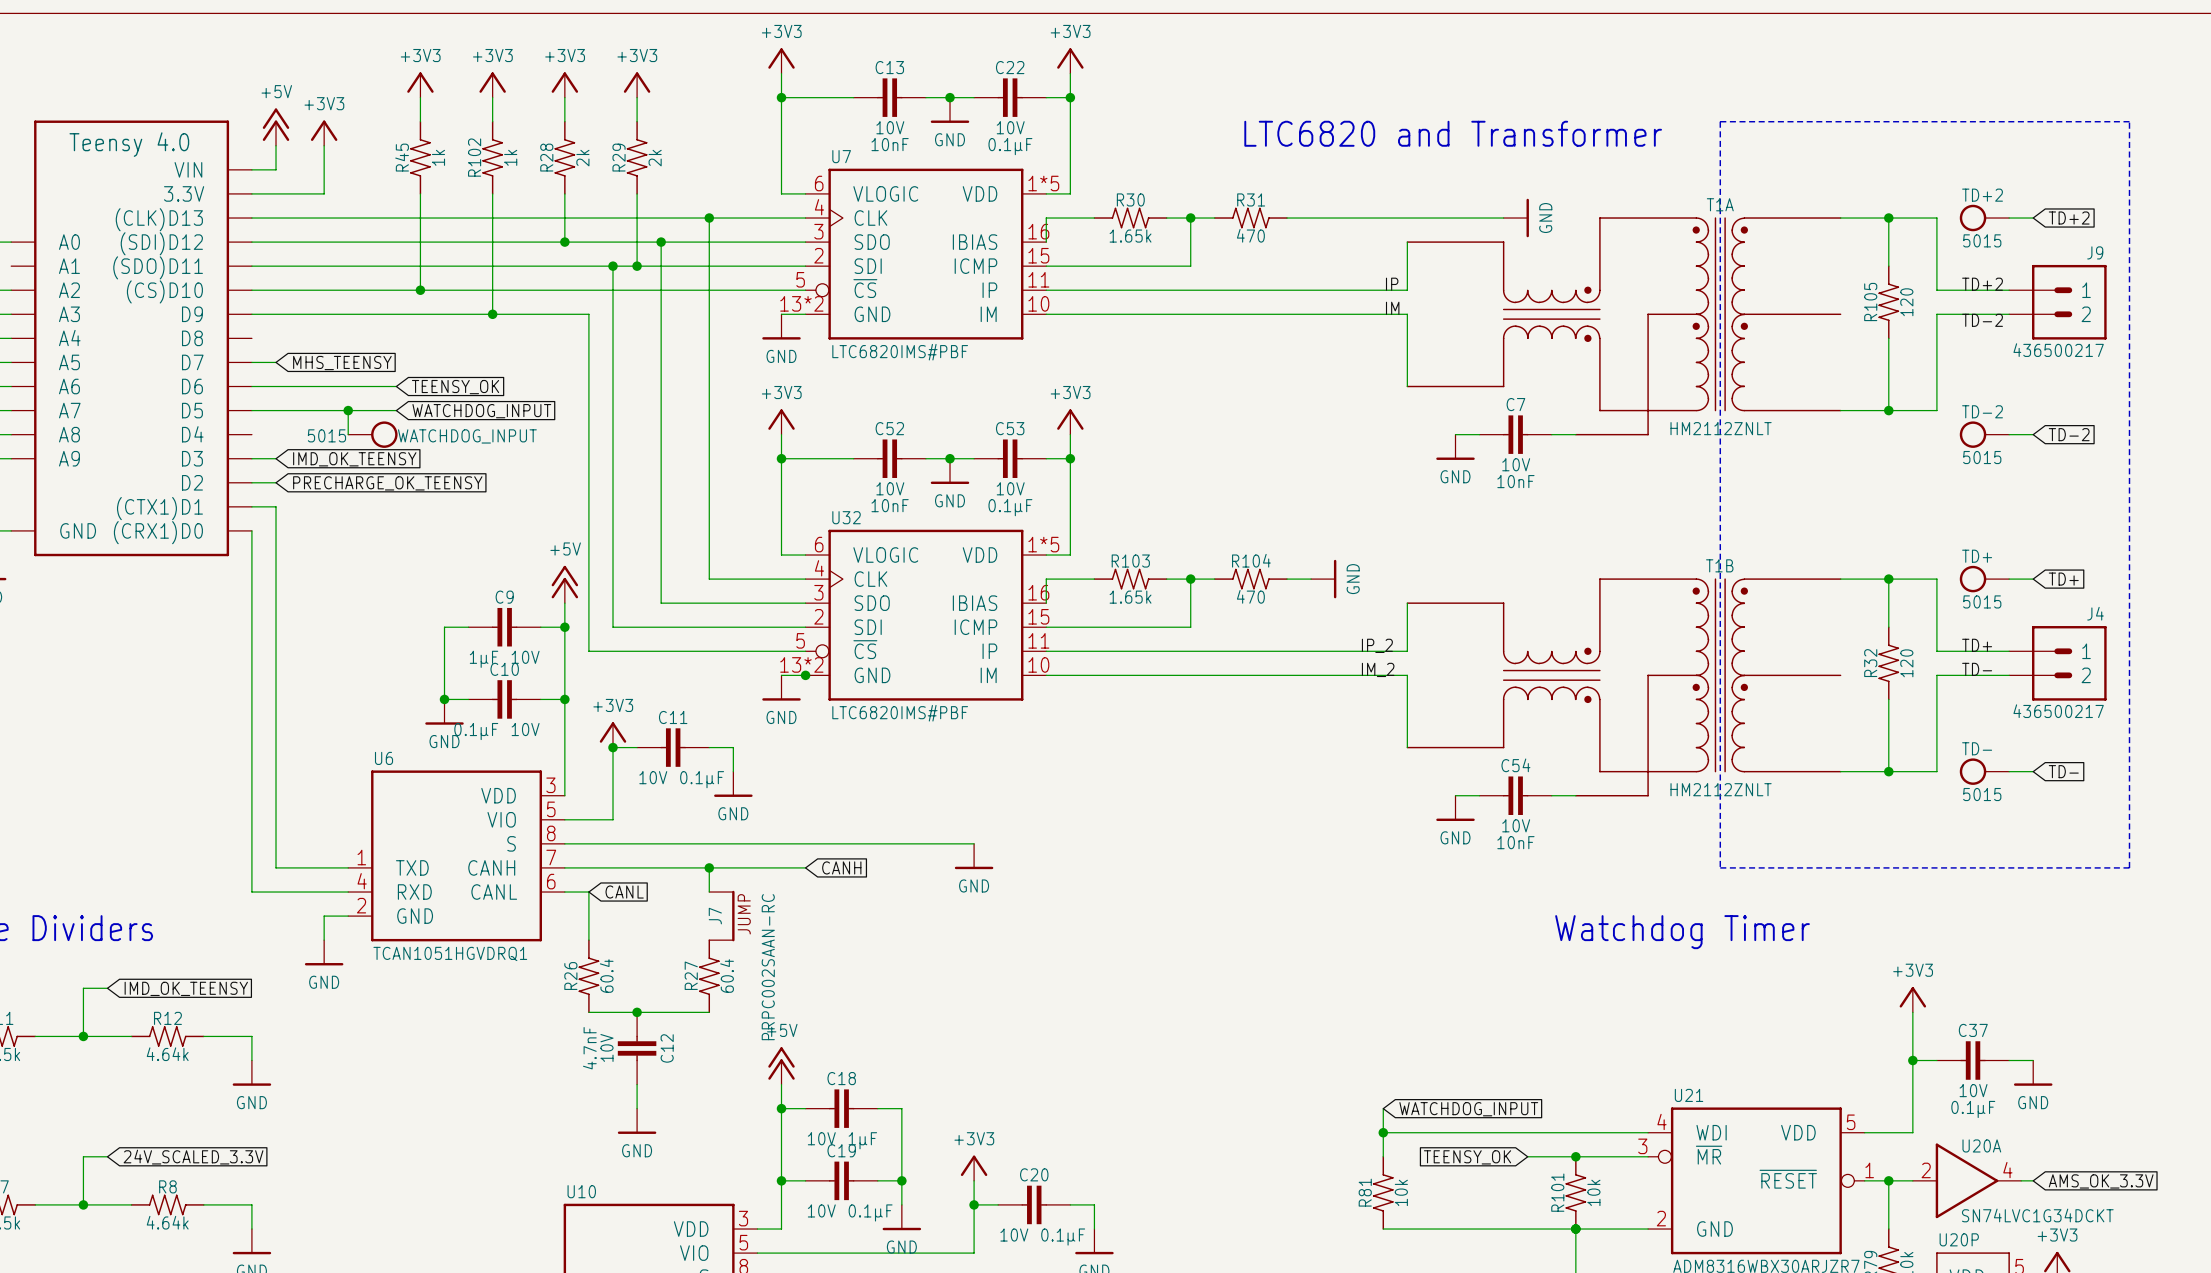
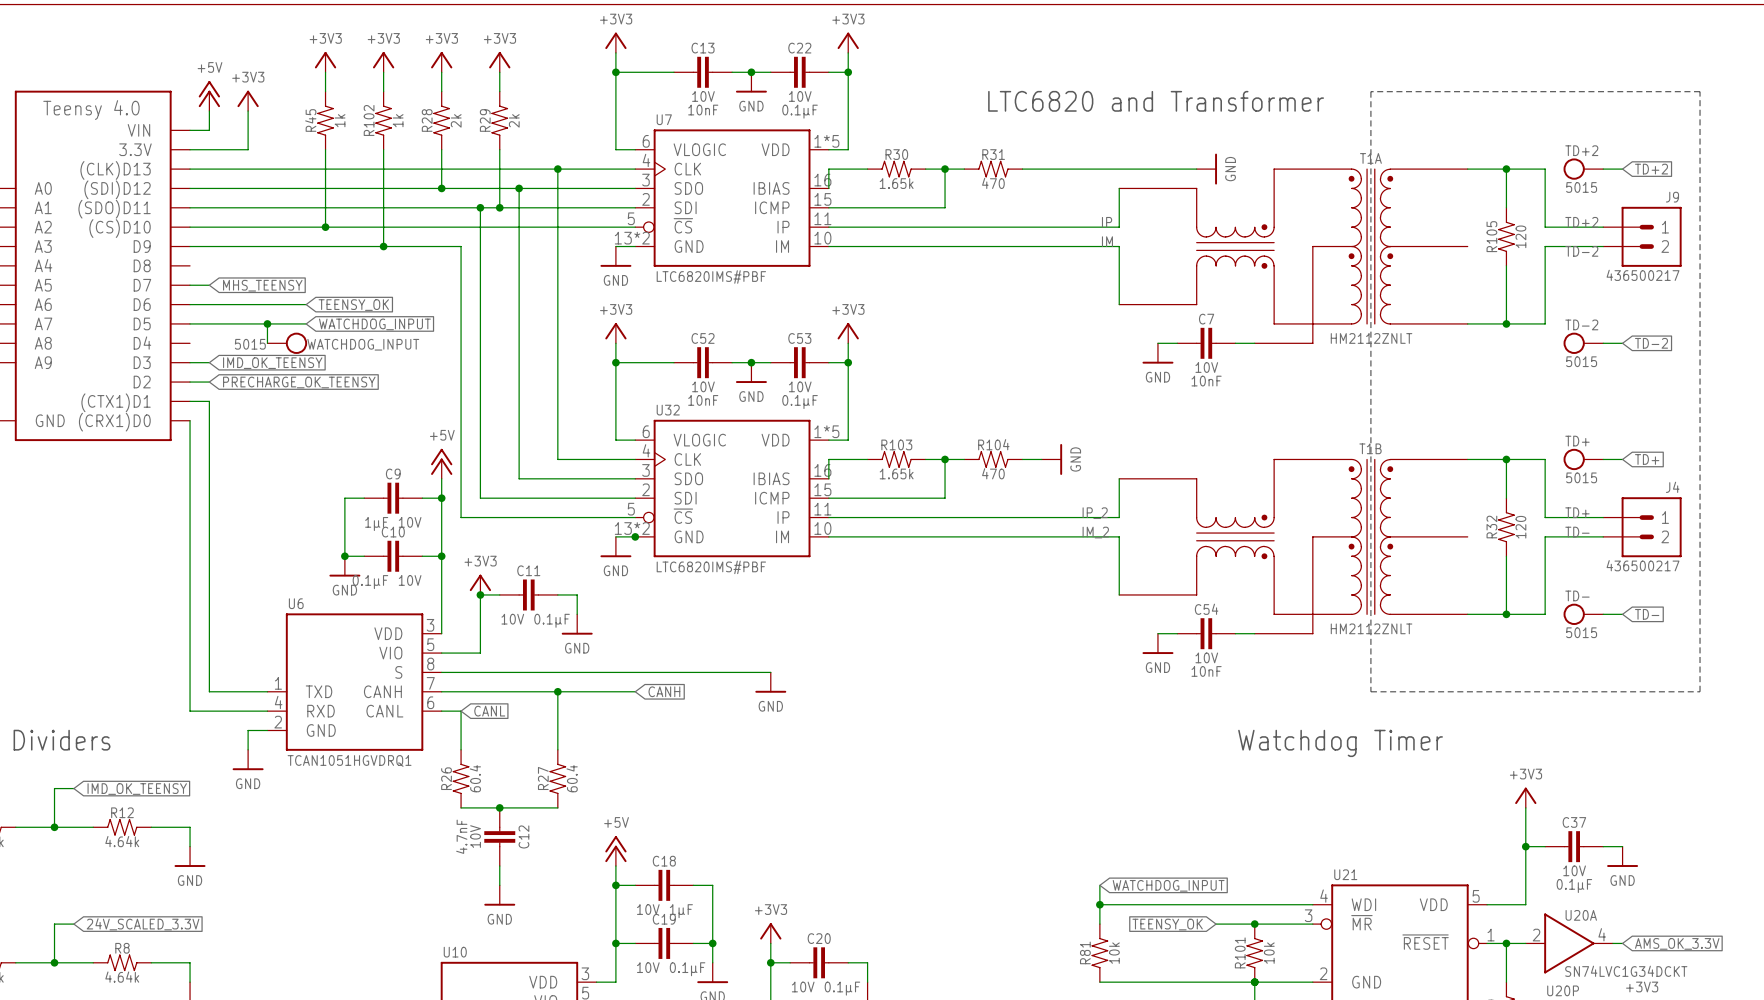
wire: none -> (557, 711) (557, 749)
J7: (721, 916) -> none

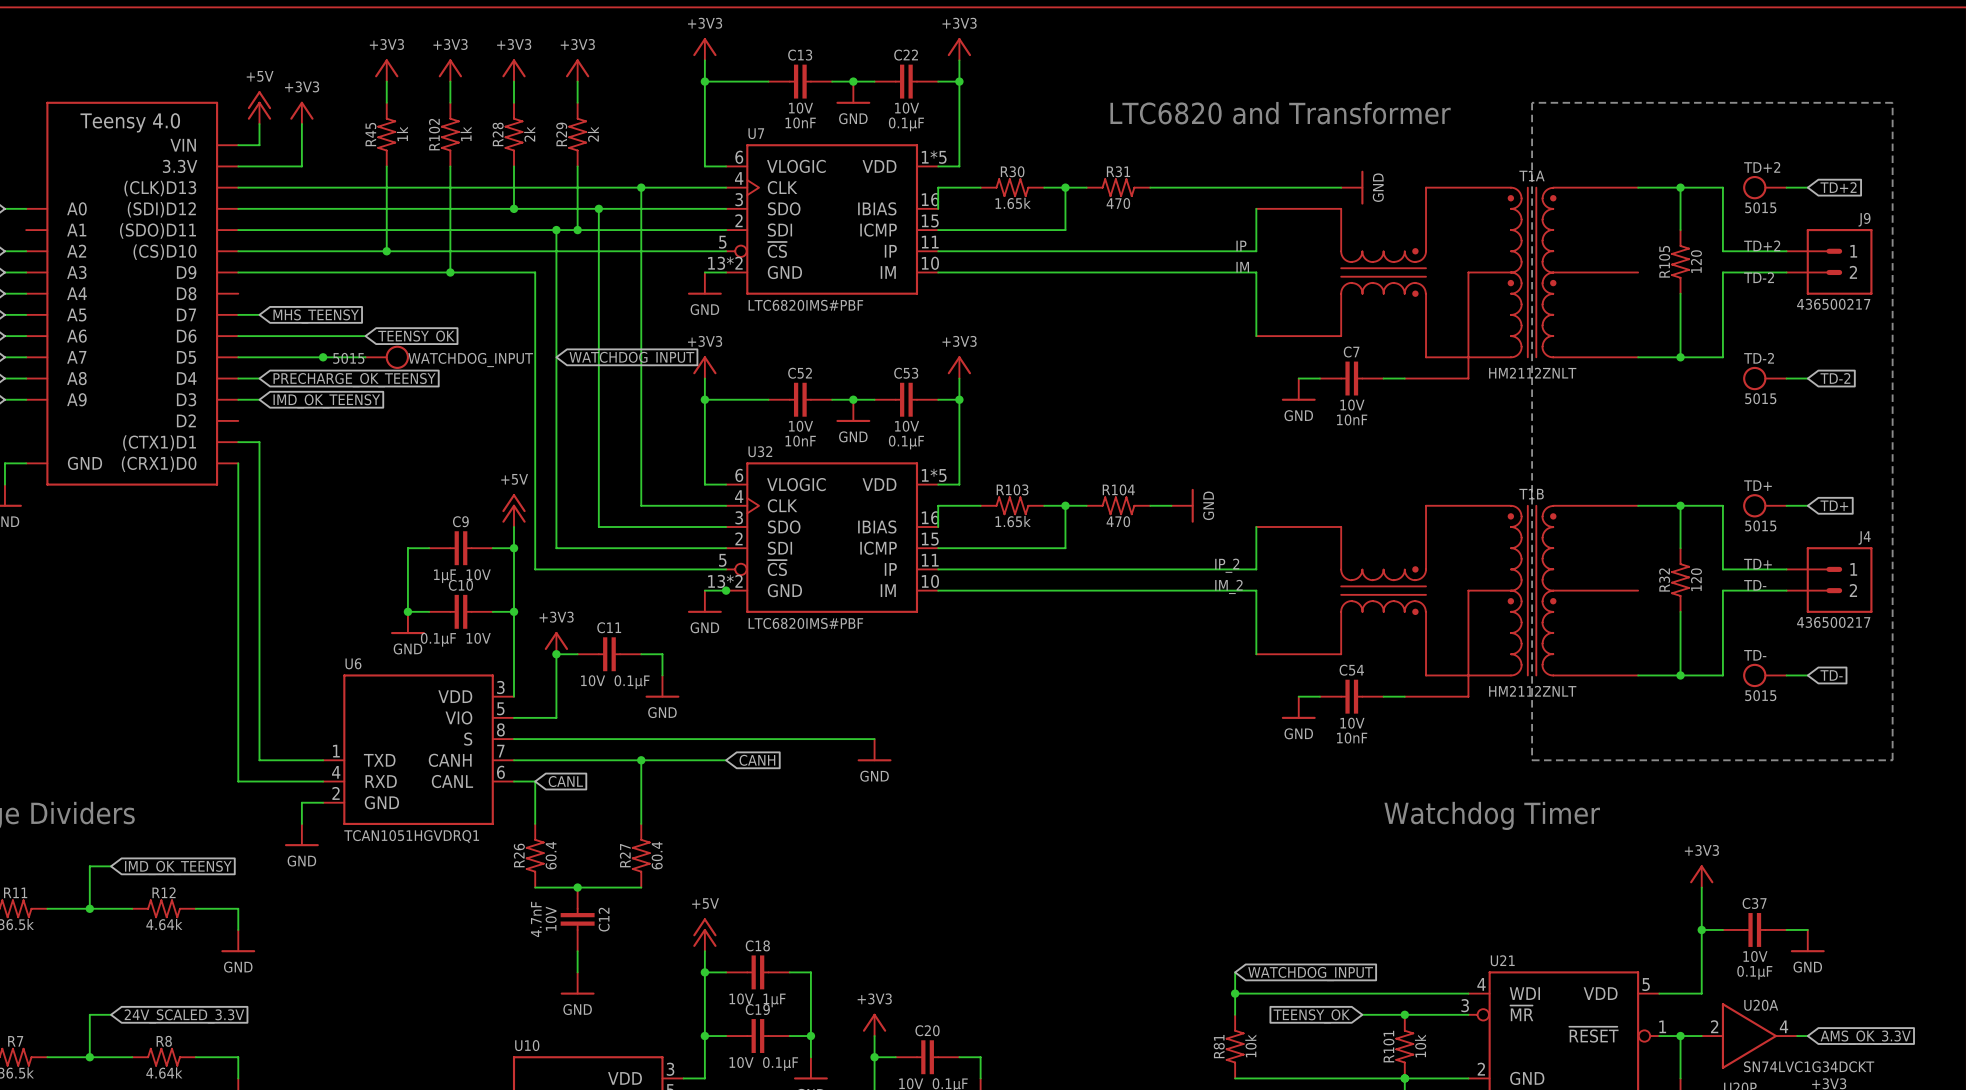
wire: (267, 323) (267, 343) -> none
global label position: WATCHDOG_INPUT (374, 324) -> WATCHDOG_INPUT (631, 358)
WATCHDOG_INPUT position: (287, 343) -> (387, 357)
wire: (190, 382) (209, 382) -> (238, 378) (259, 378)
global label position: PRECHARGE_OK_TEENSY (299, 382) -> PRECHARGE_OK_TEENSY (354, 380)

